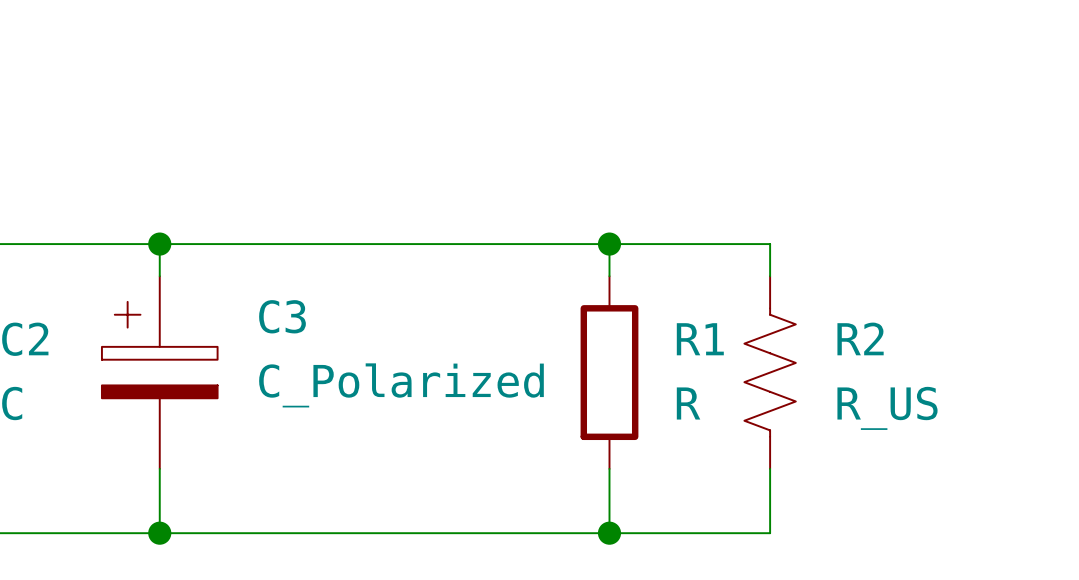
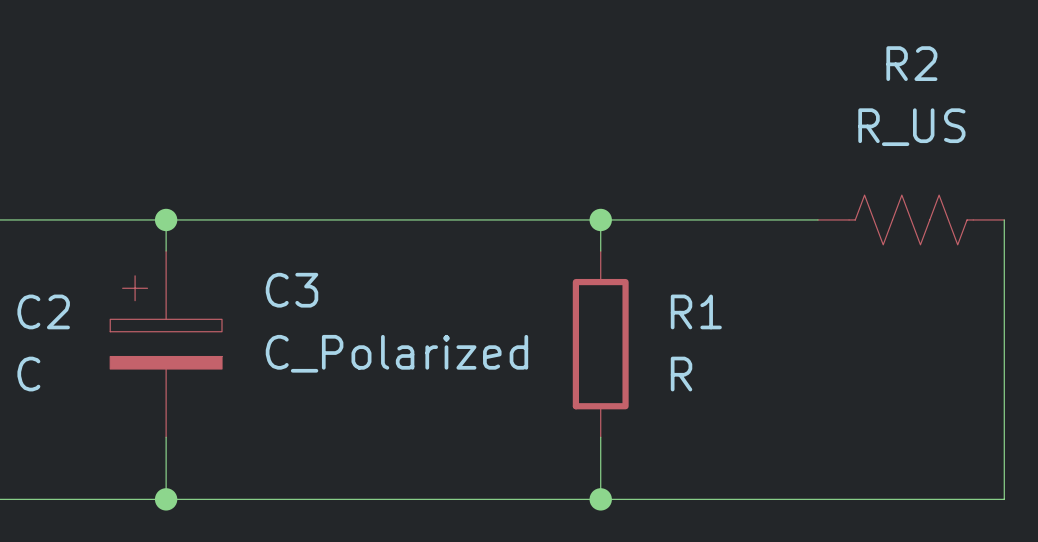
wire: (770, 244) (770, 276) -> (755, 219) (818, 219)
R2 name position: R2 (860, 338) -> R2 (911, 63)
R2 rotation: 0° (770, 372) -> 90° clockwise (911, 219)
R2 position: (770, 372) -> (911, 219)
R2 value position: R_US (887, 408) -> R_US (911, 127)
wire: (770, 468) (770, 533) -> (1004, 219) (1004, 499) (755, 499)

